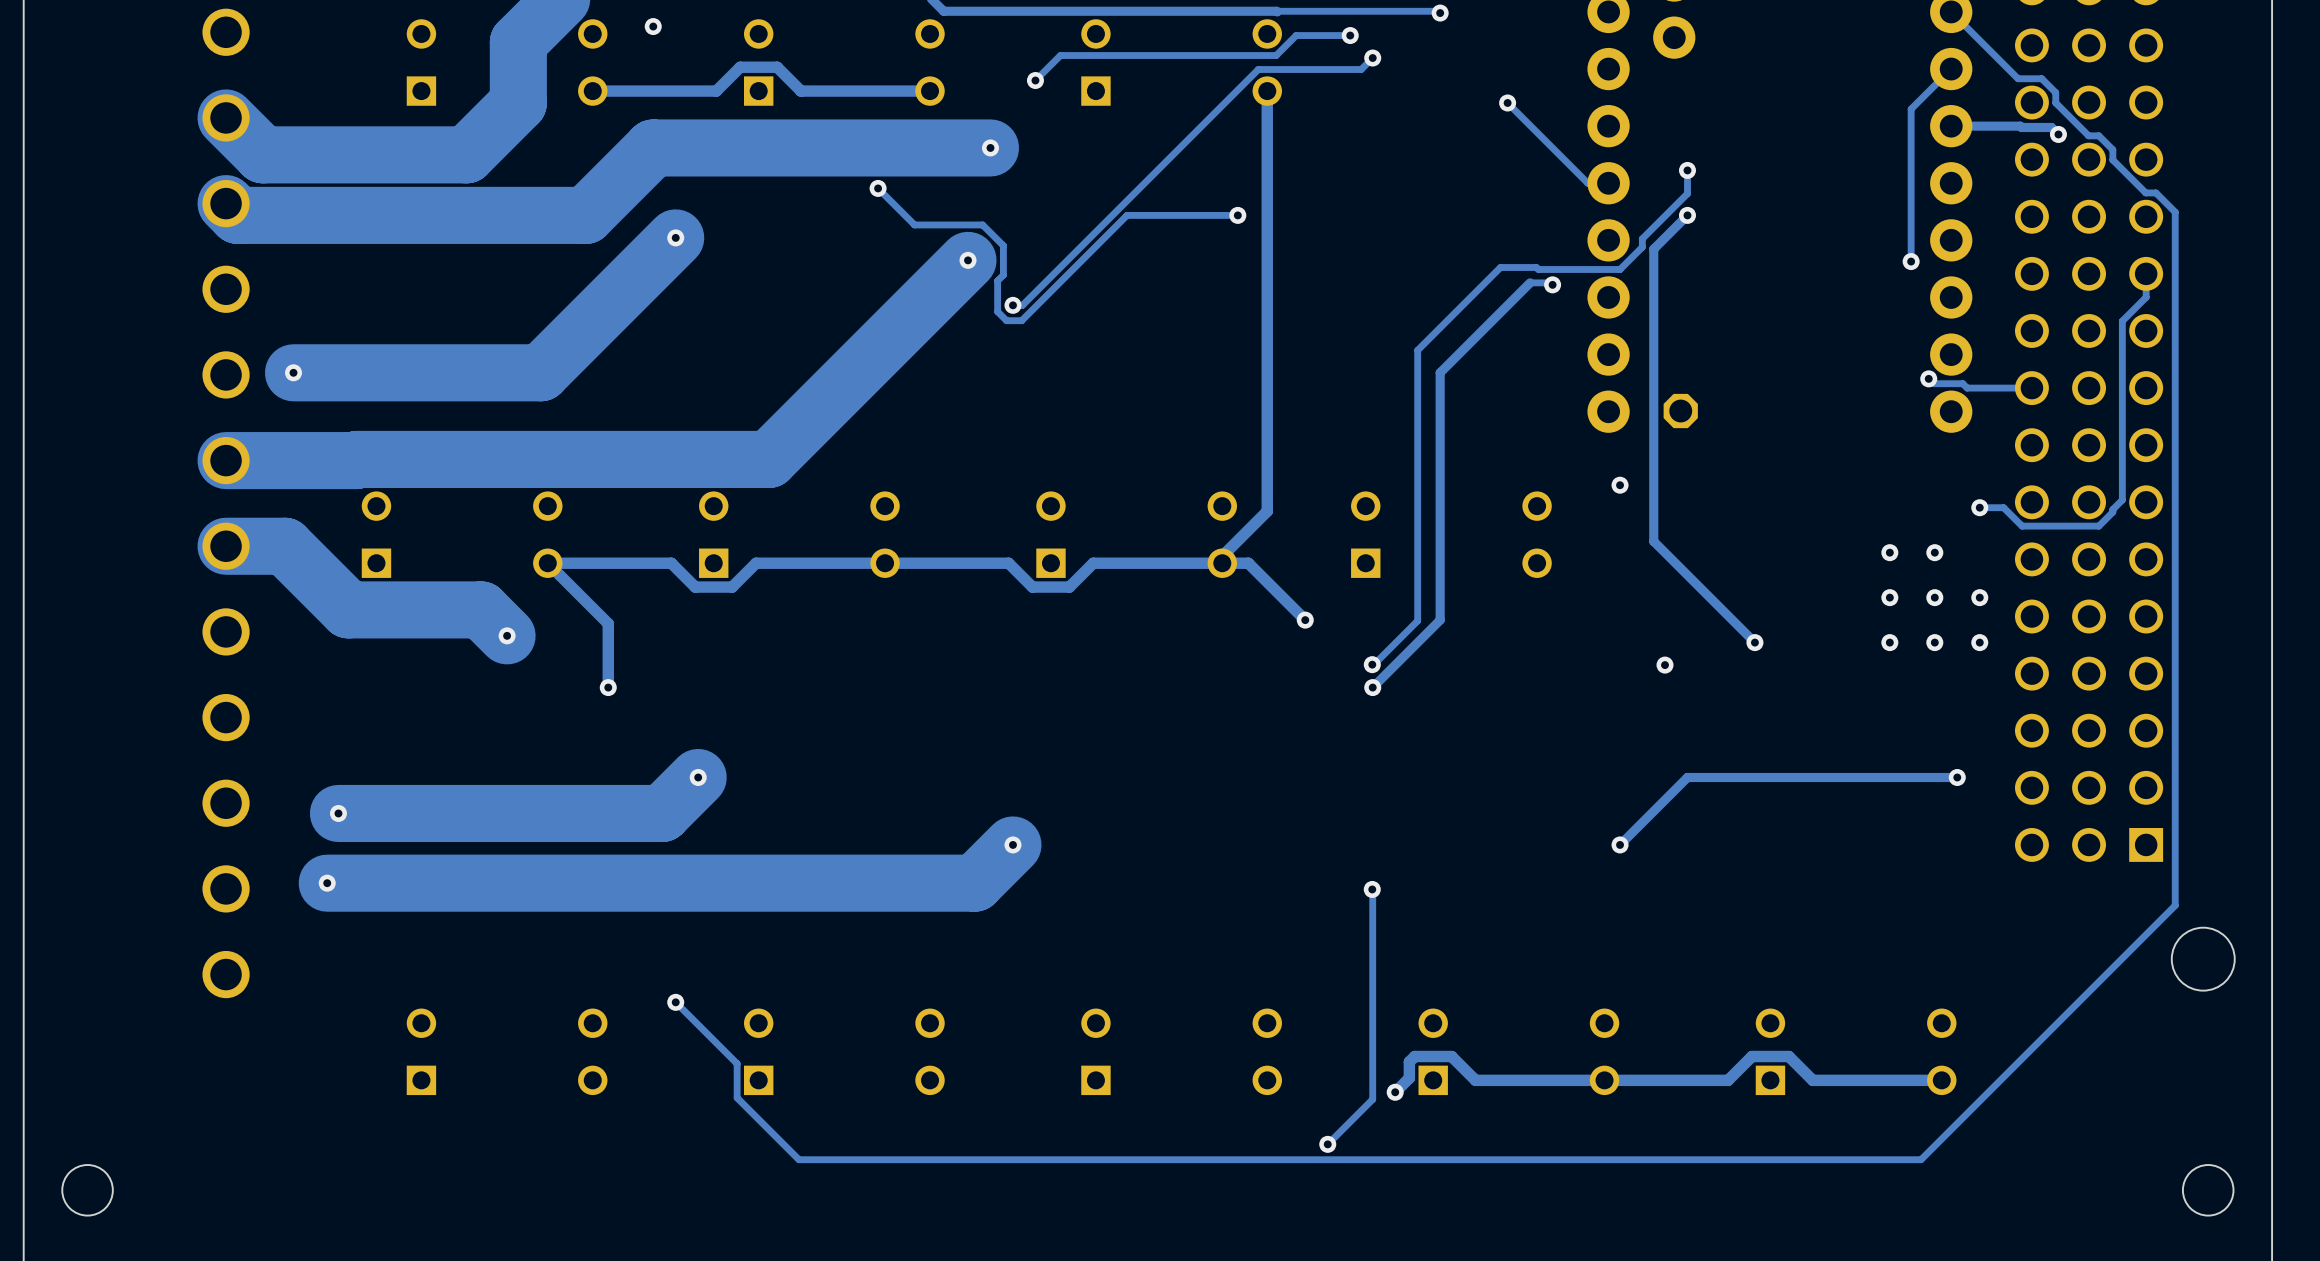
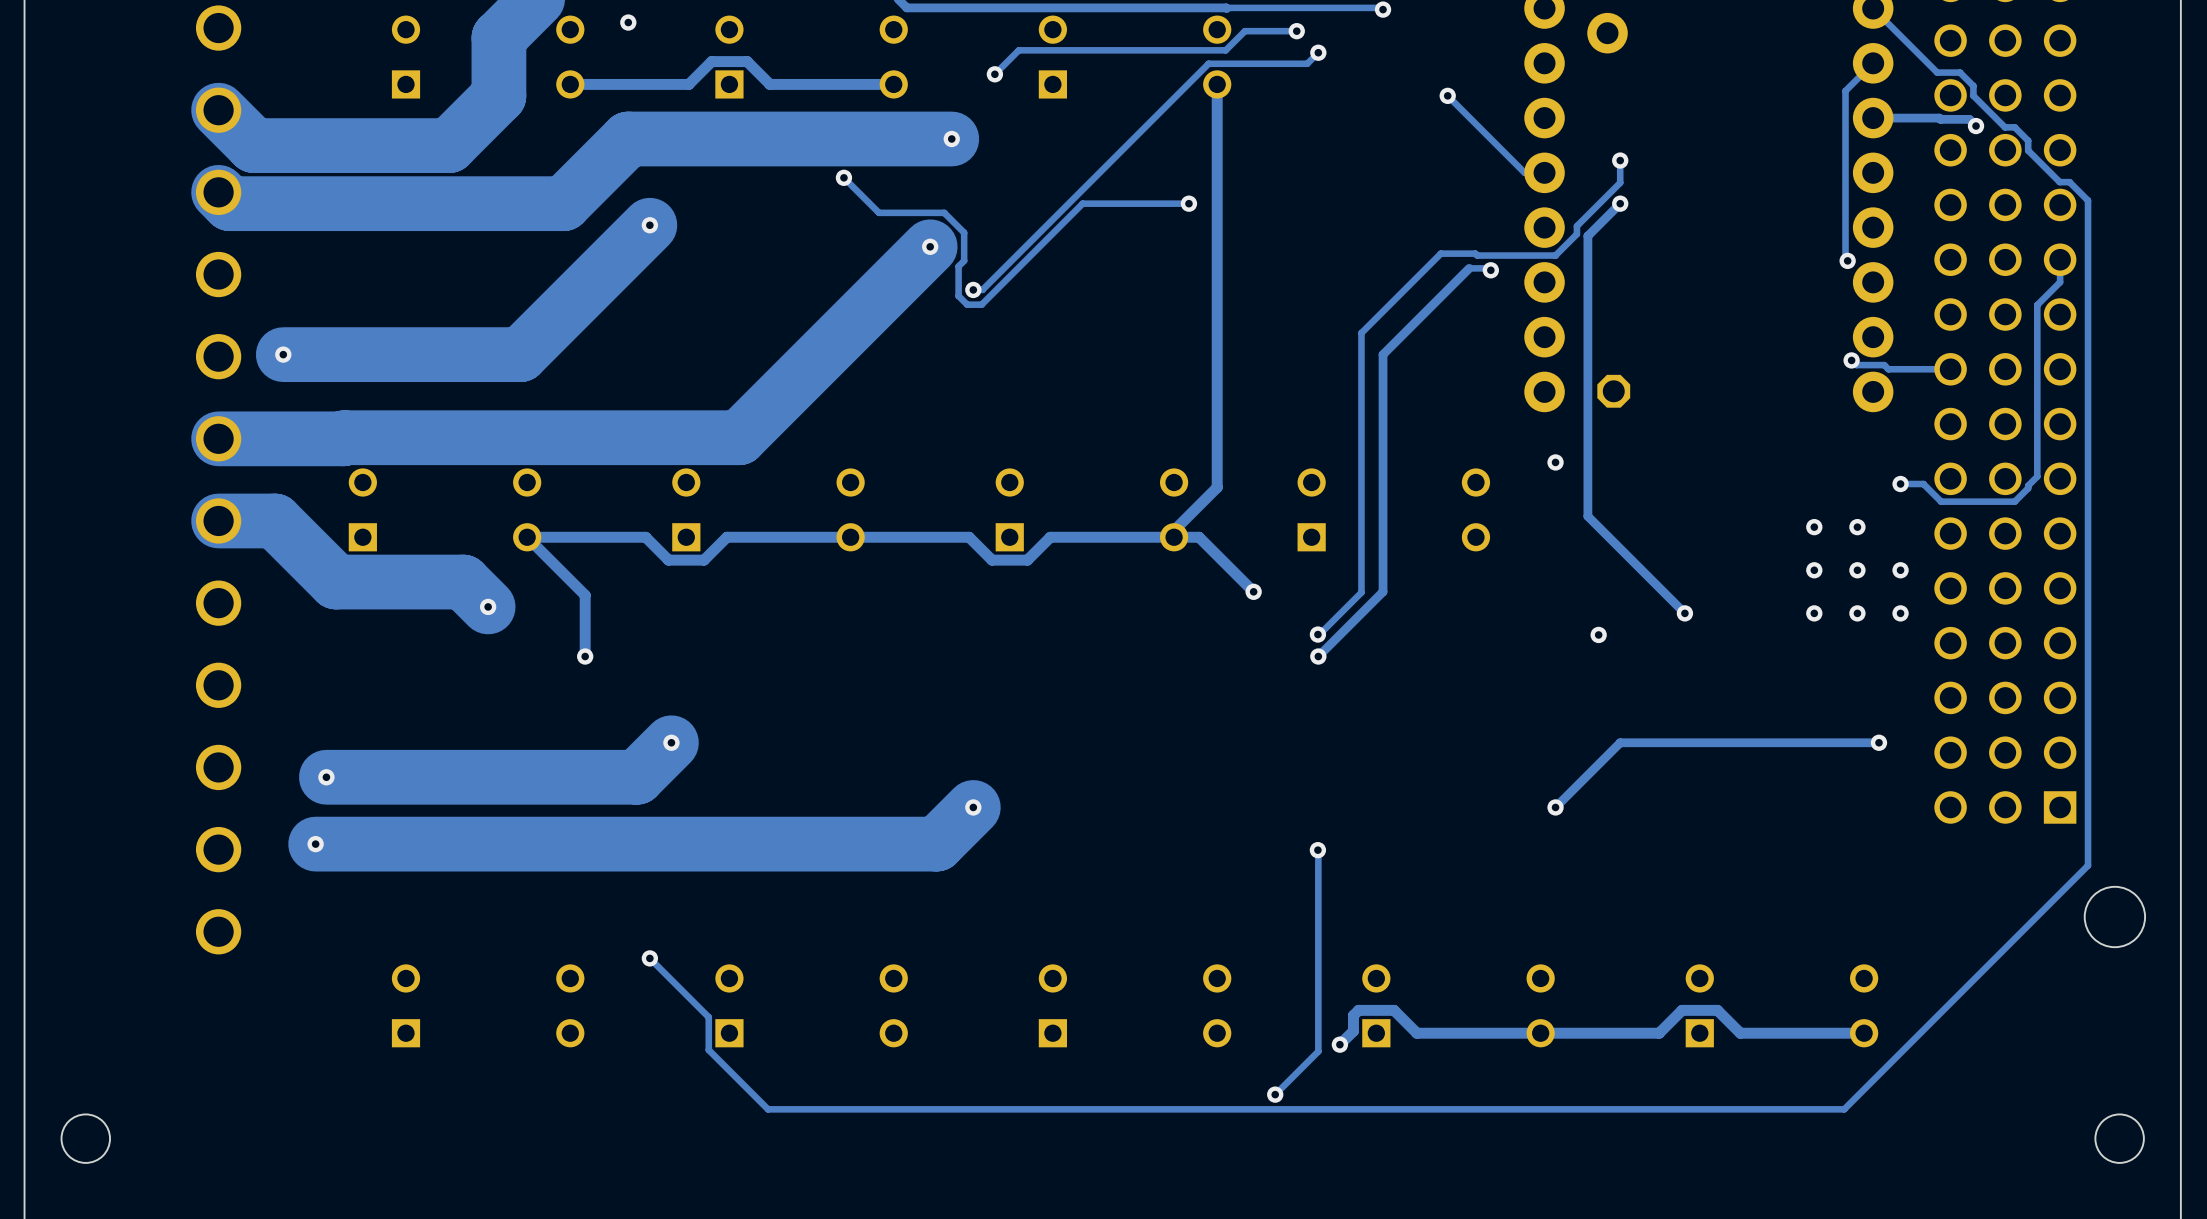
track: (1922, 97) (1911, 109) (1911, 261) -> (1845, 90) (1845, 258) (1847, 260)
via position: (1911, 261) -> (1847, 260)

